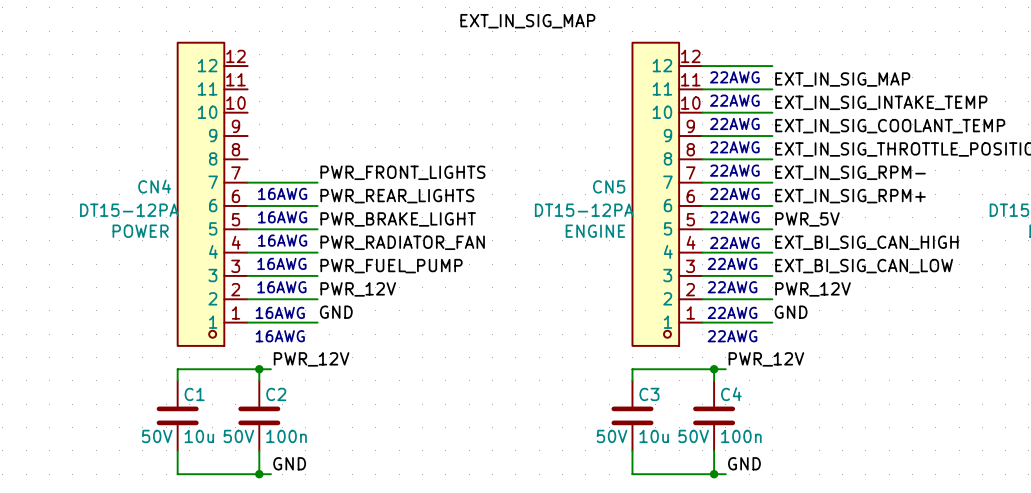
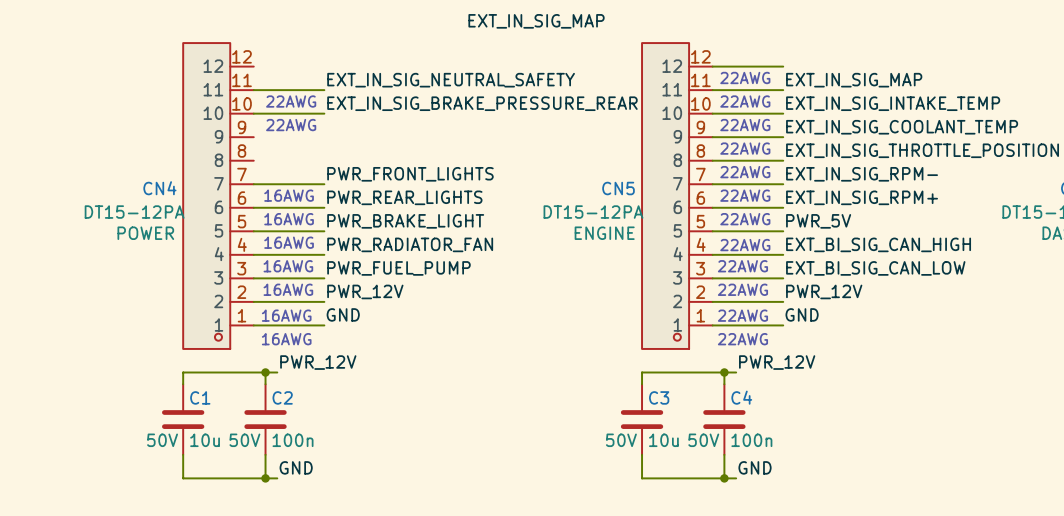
label: none -> EXT_IN_SIG_NEUTRAL_SAFETY (451, 80)
wire: none -> (253, 90) (324, 90)
text: none -> 22AWG (291, 101)
label: none -> EXT_IN_SIG_BRAKE_PRESSURE_REAR (482, 103)
wire: none -> (253, 113) (324, 113)
text: none -> 22AWG (291, 125)

